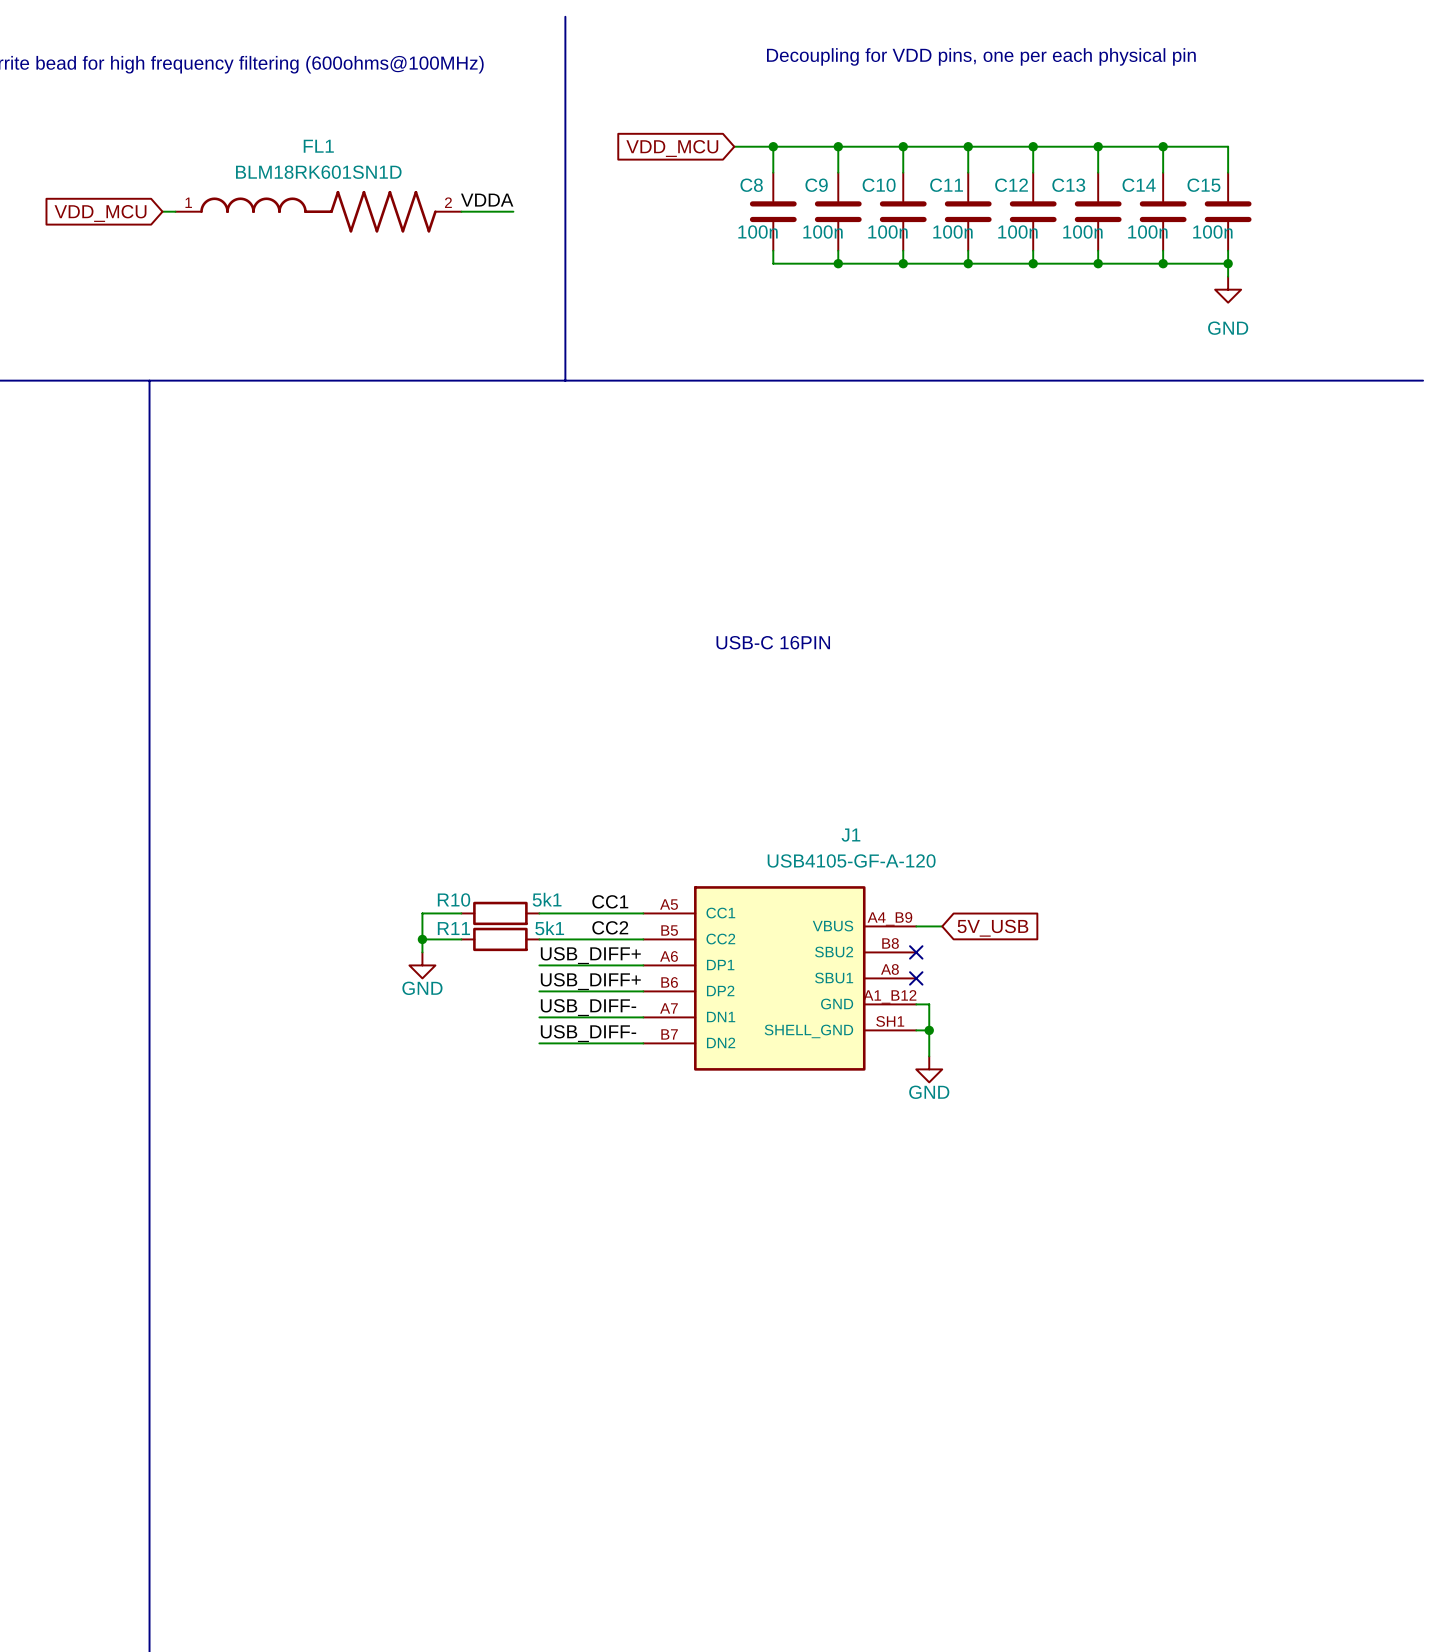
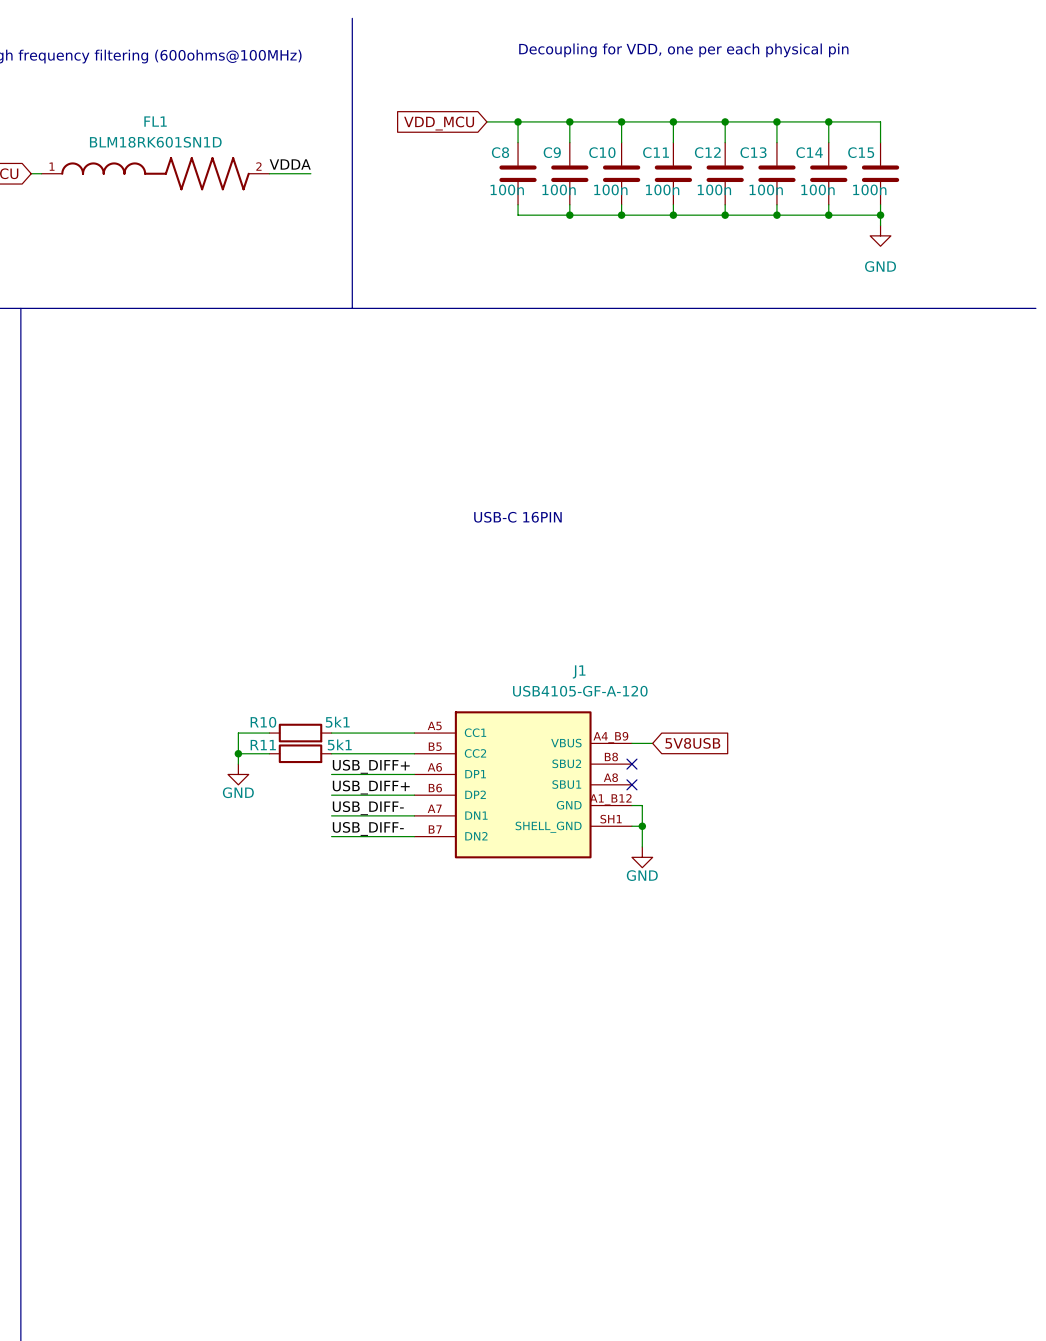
text: Decoupling for VDD pins, one per each physical pin (981, 56) -> Decoupling for VDD, one per each physical pin (683, 50)
label: CC1 (610, 901) -> none
label: CC2 (610, 927) -> none
global label: 5V_USB (992, 928) -> 5V8USB (692, 743)

